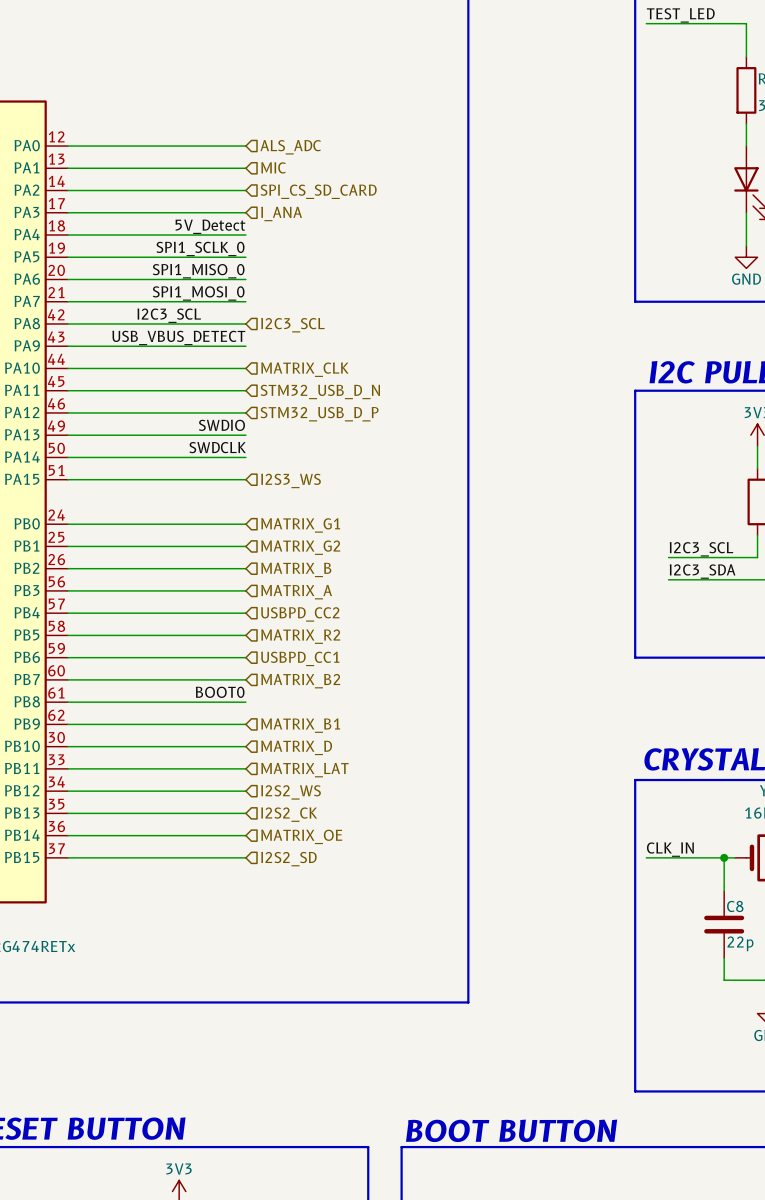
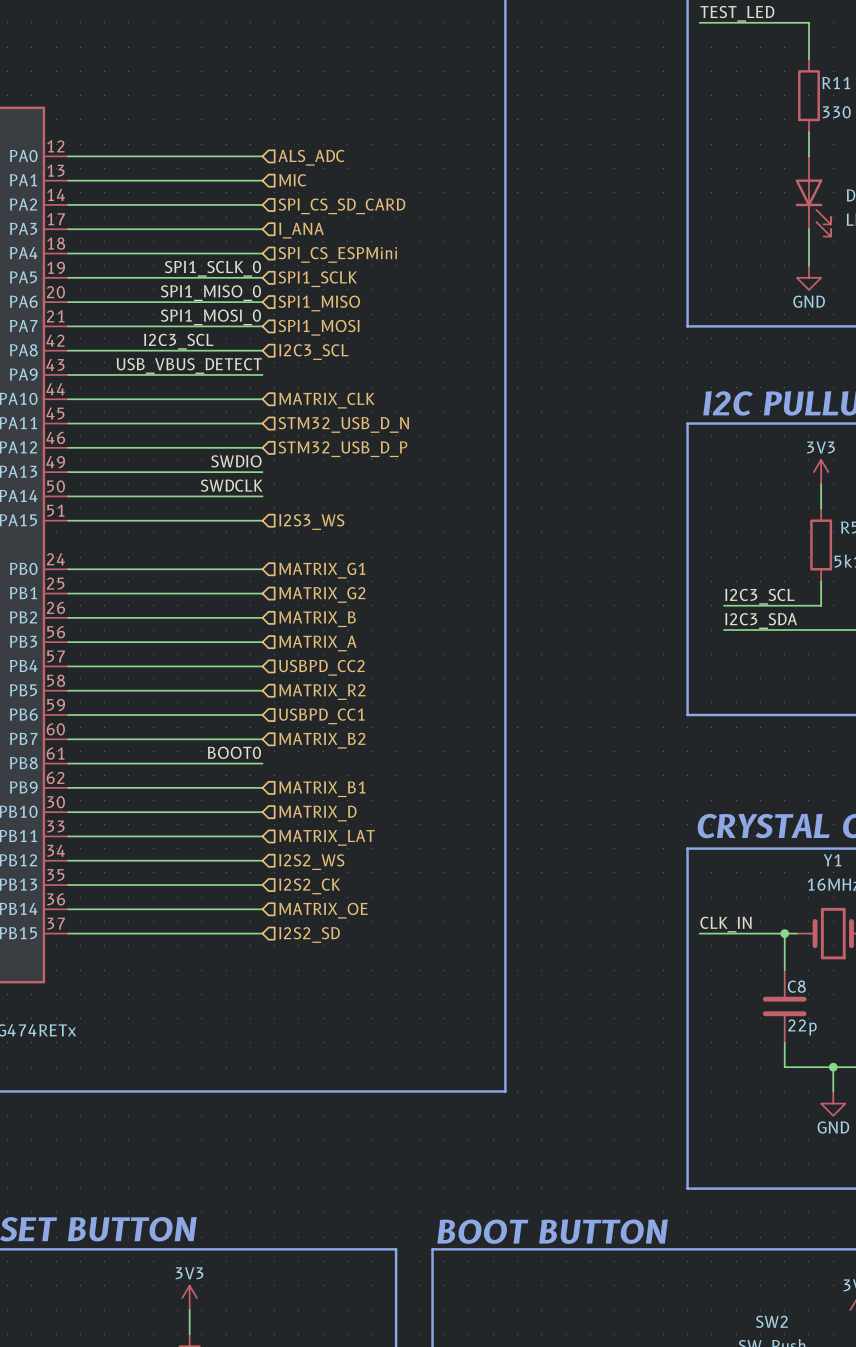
label: 5V_Detect (210, 226) -> none
hierarchical label: none -> SPI_CS_ESPMini (337, 254)
hierarchical label: none -> SPI1_SCLK (317, 279)
hierarchical label: none -> SPI1_MISO (319, 303)
hierarchical label: none -> SPI1_MOSI (319, 327)

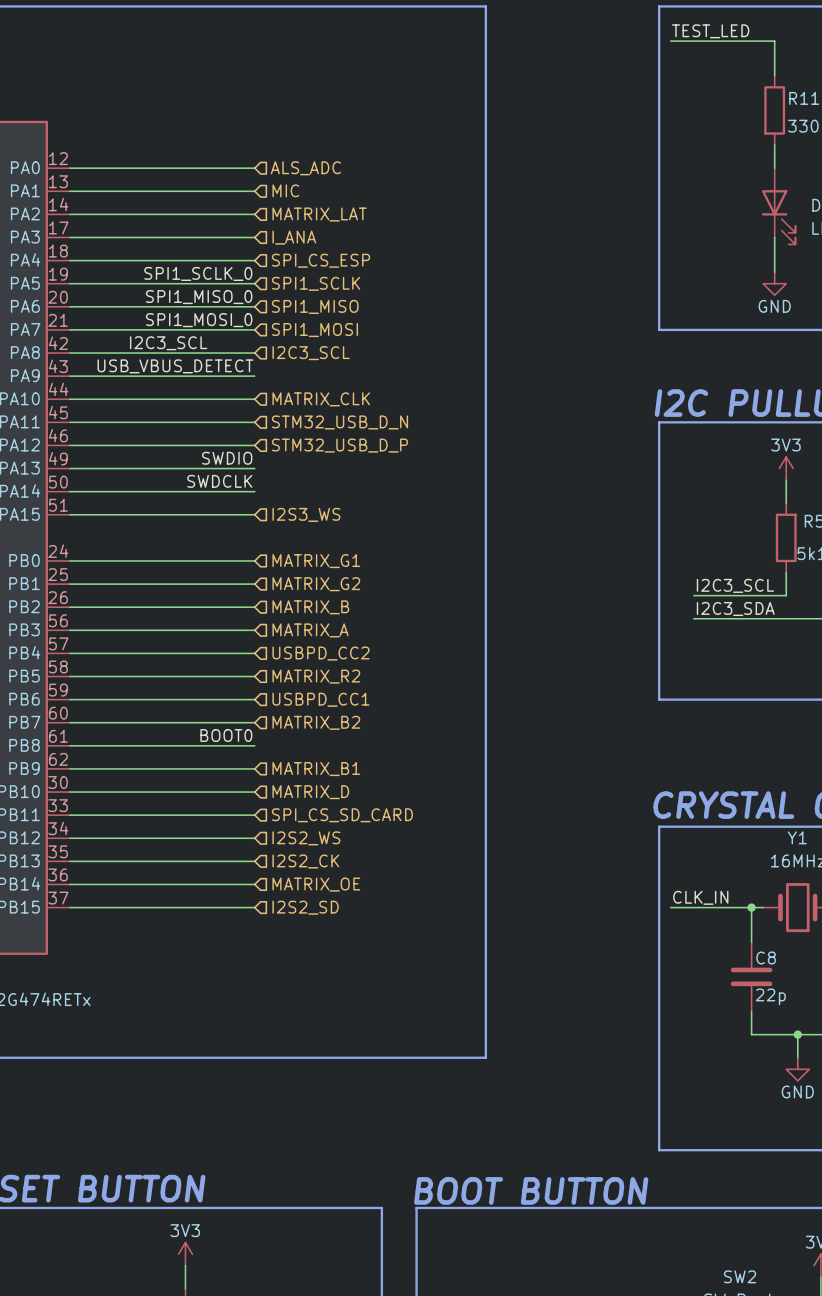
hierarchical label: SPI_CS_SD_CARD (341, 206) -> MATRIX_LAT (319, 214)
hierarchical label: SPI_CS_ESPMini (337, 254) -> SPI_CS_ESP (321, 260)
hierarchical label: MATRIX_LAT (327, 837) -> SPI_CS_SD_CARD (342, 815)

